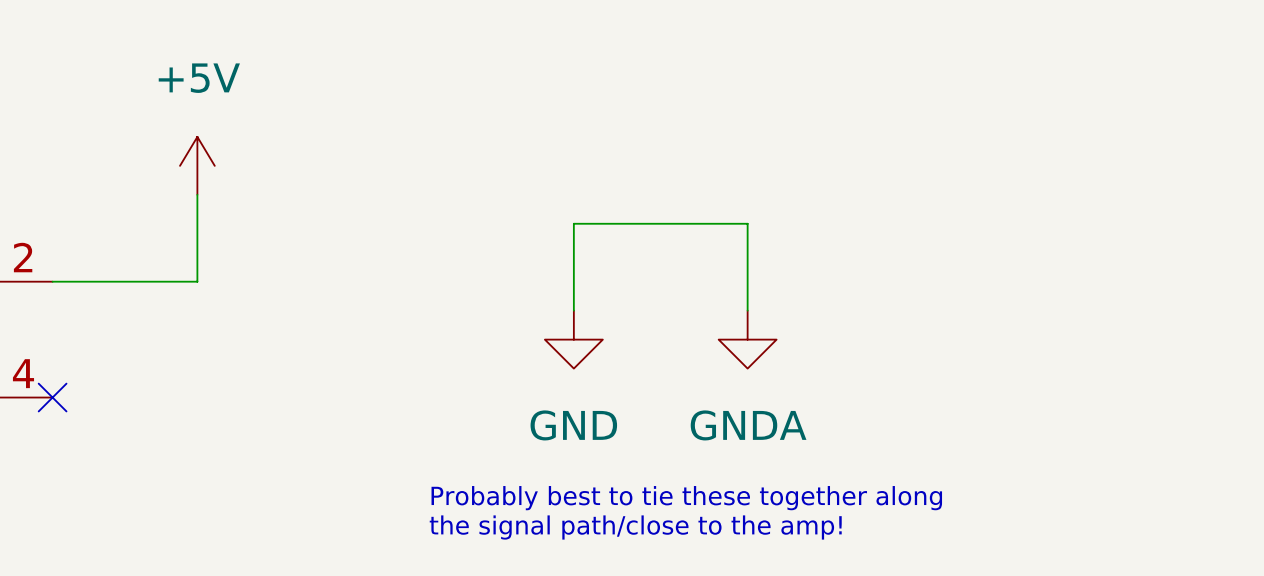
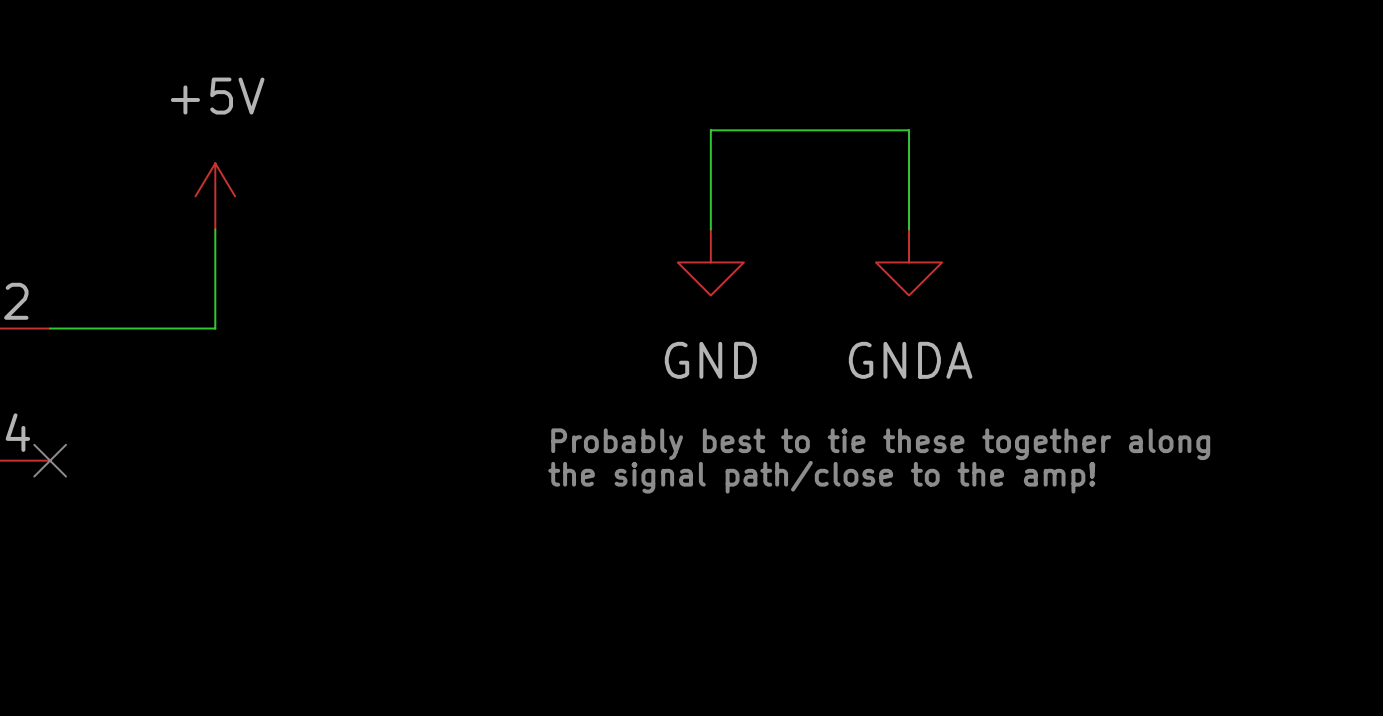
wire: (573, 310) (573, 223) (747, 223) (747, 310) -> (710, 229) (710, 130) (909, 130) (909, 229)
power symbol position: GND (573, 339) -> GND (710, 262)
power symbol position: GNDA (747, 339) -> GNDA (909, 262)
text position: Probably best to tie these together along (686, 498) -> Probably best to tie these together along (880, 444)
text position: the signal path/close to the amp! (635, 527) -> the signal path/close to the amp! (821, 477)

